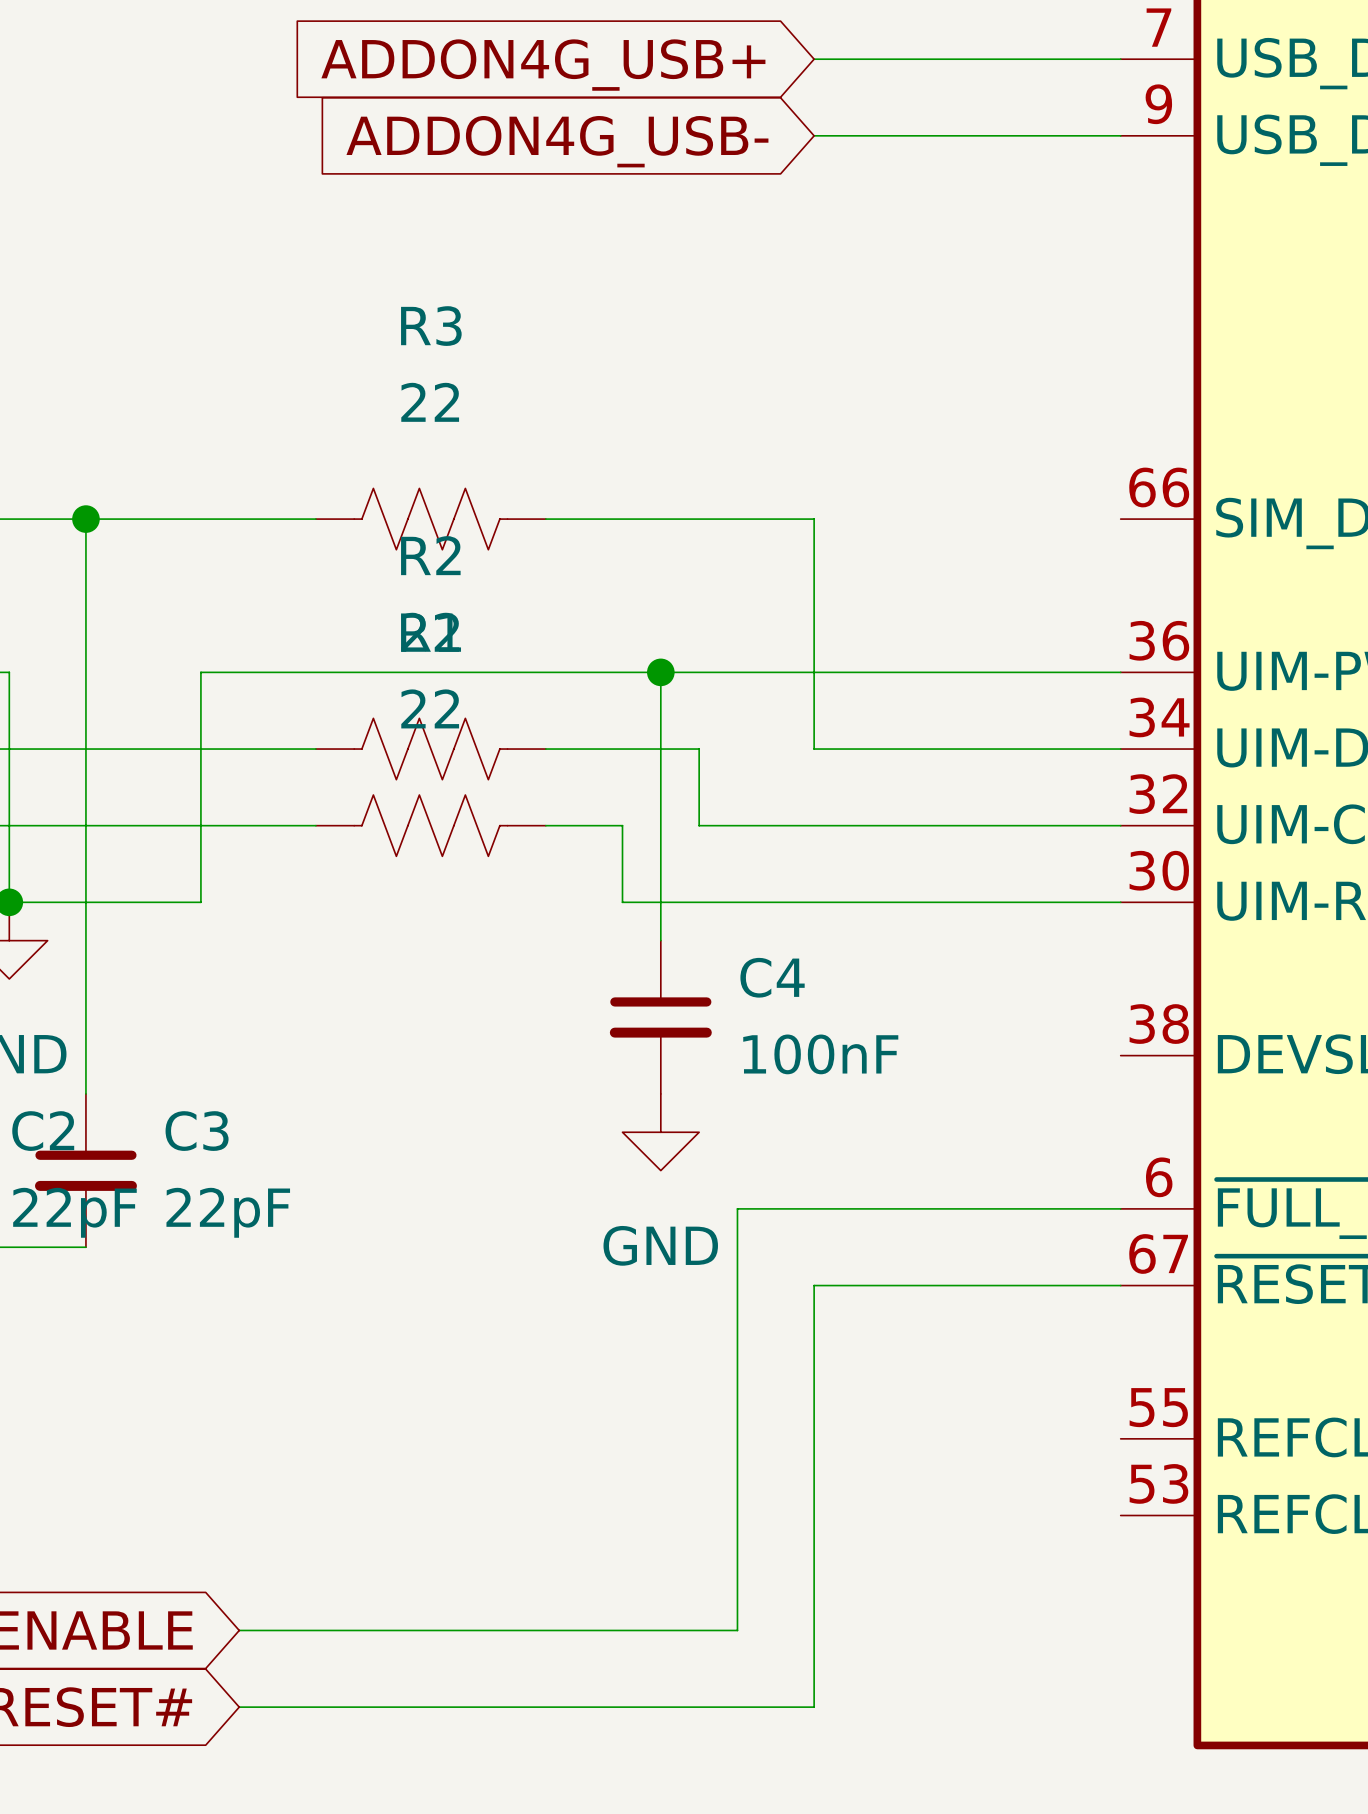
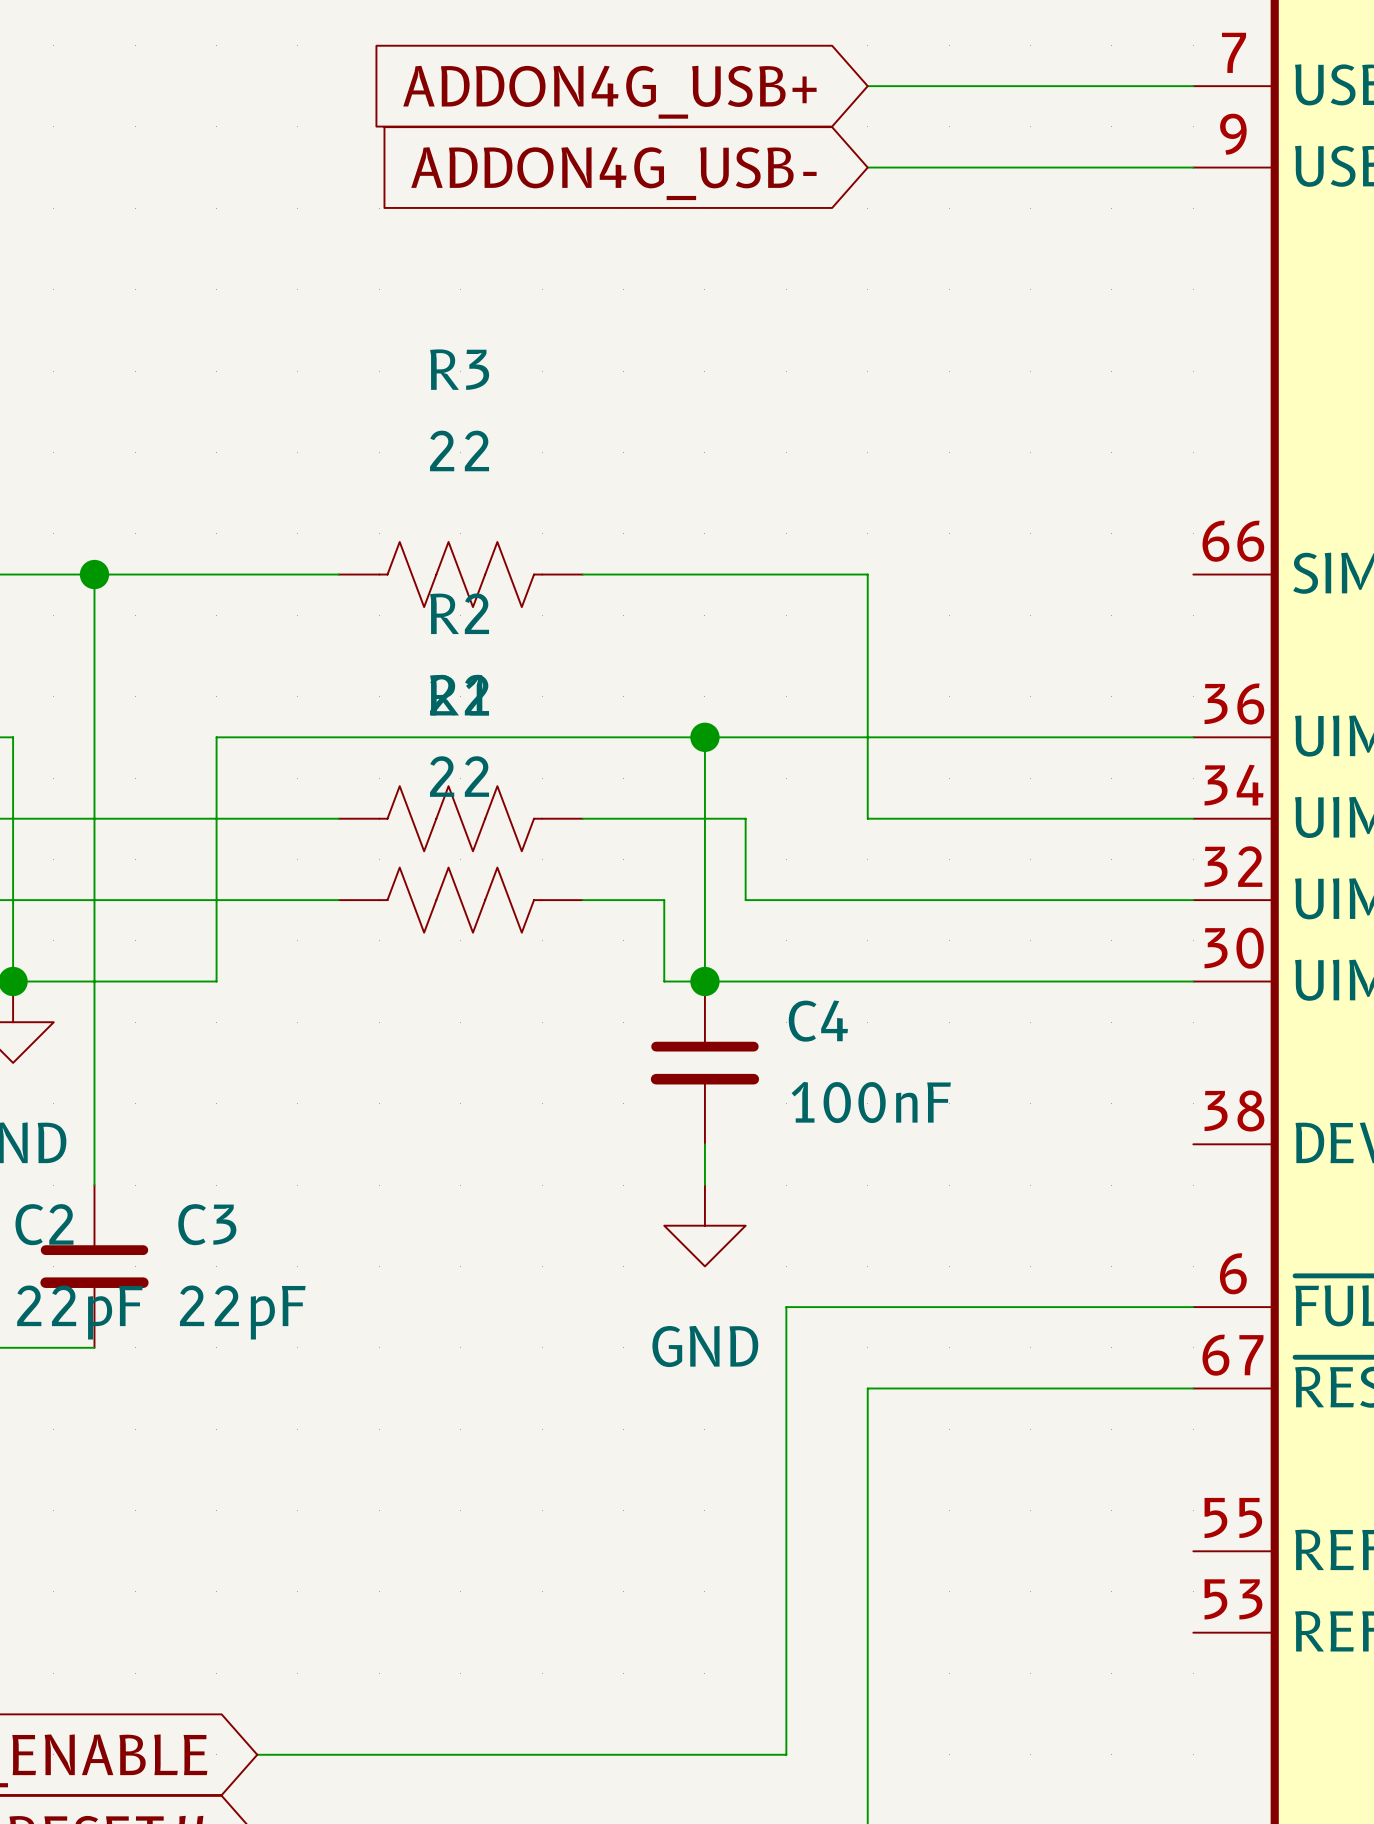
junction: none -> (704, 981)
C4 position: (660, 1017) -> (704, 1062)

